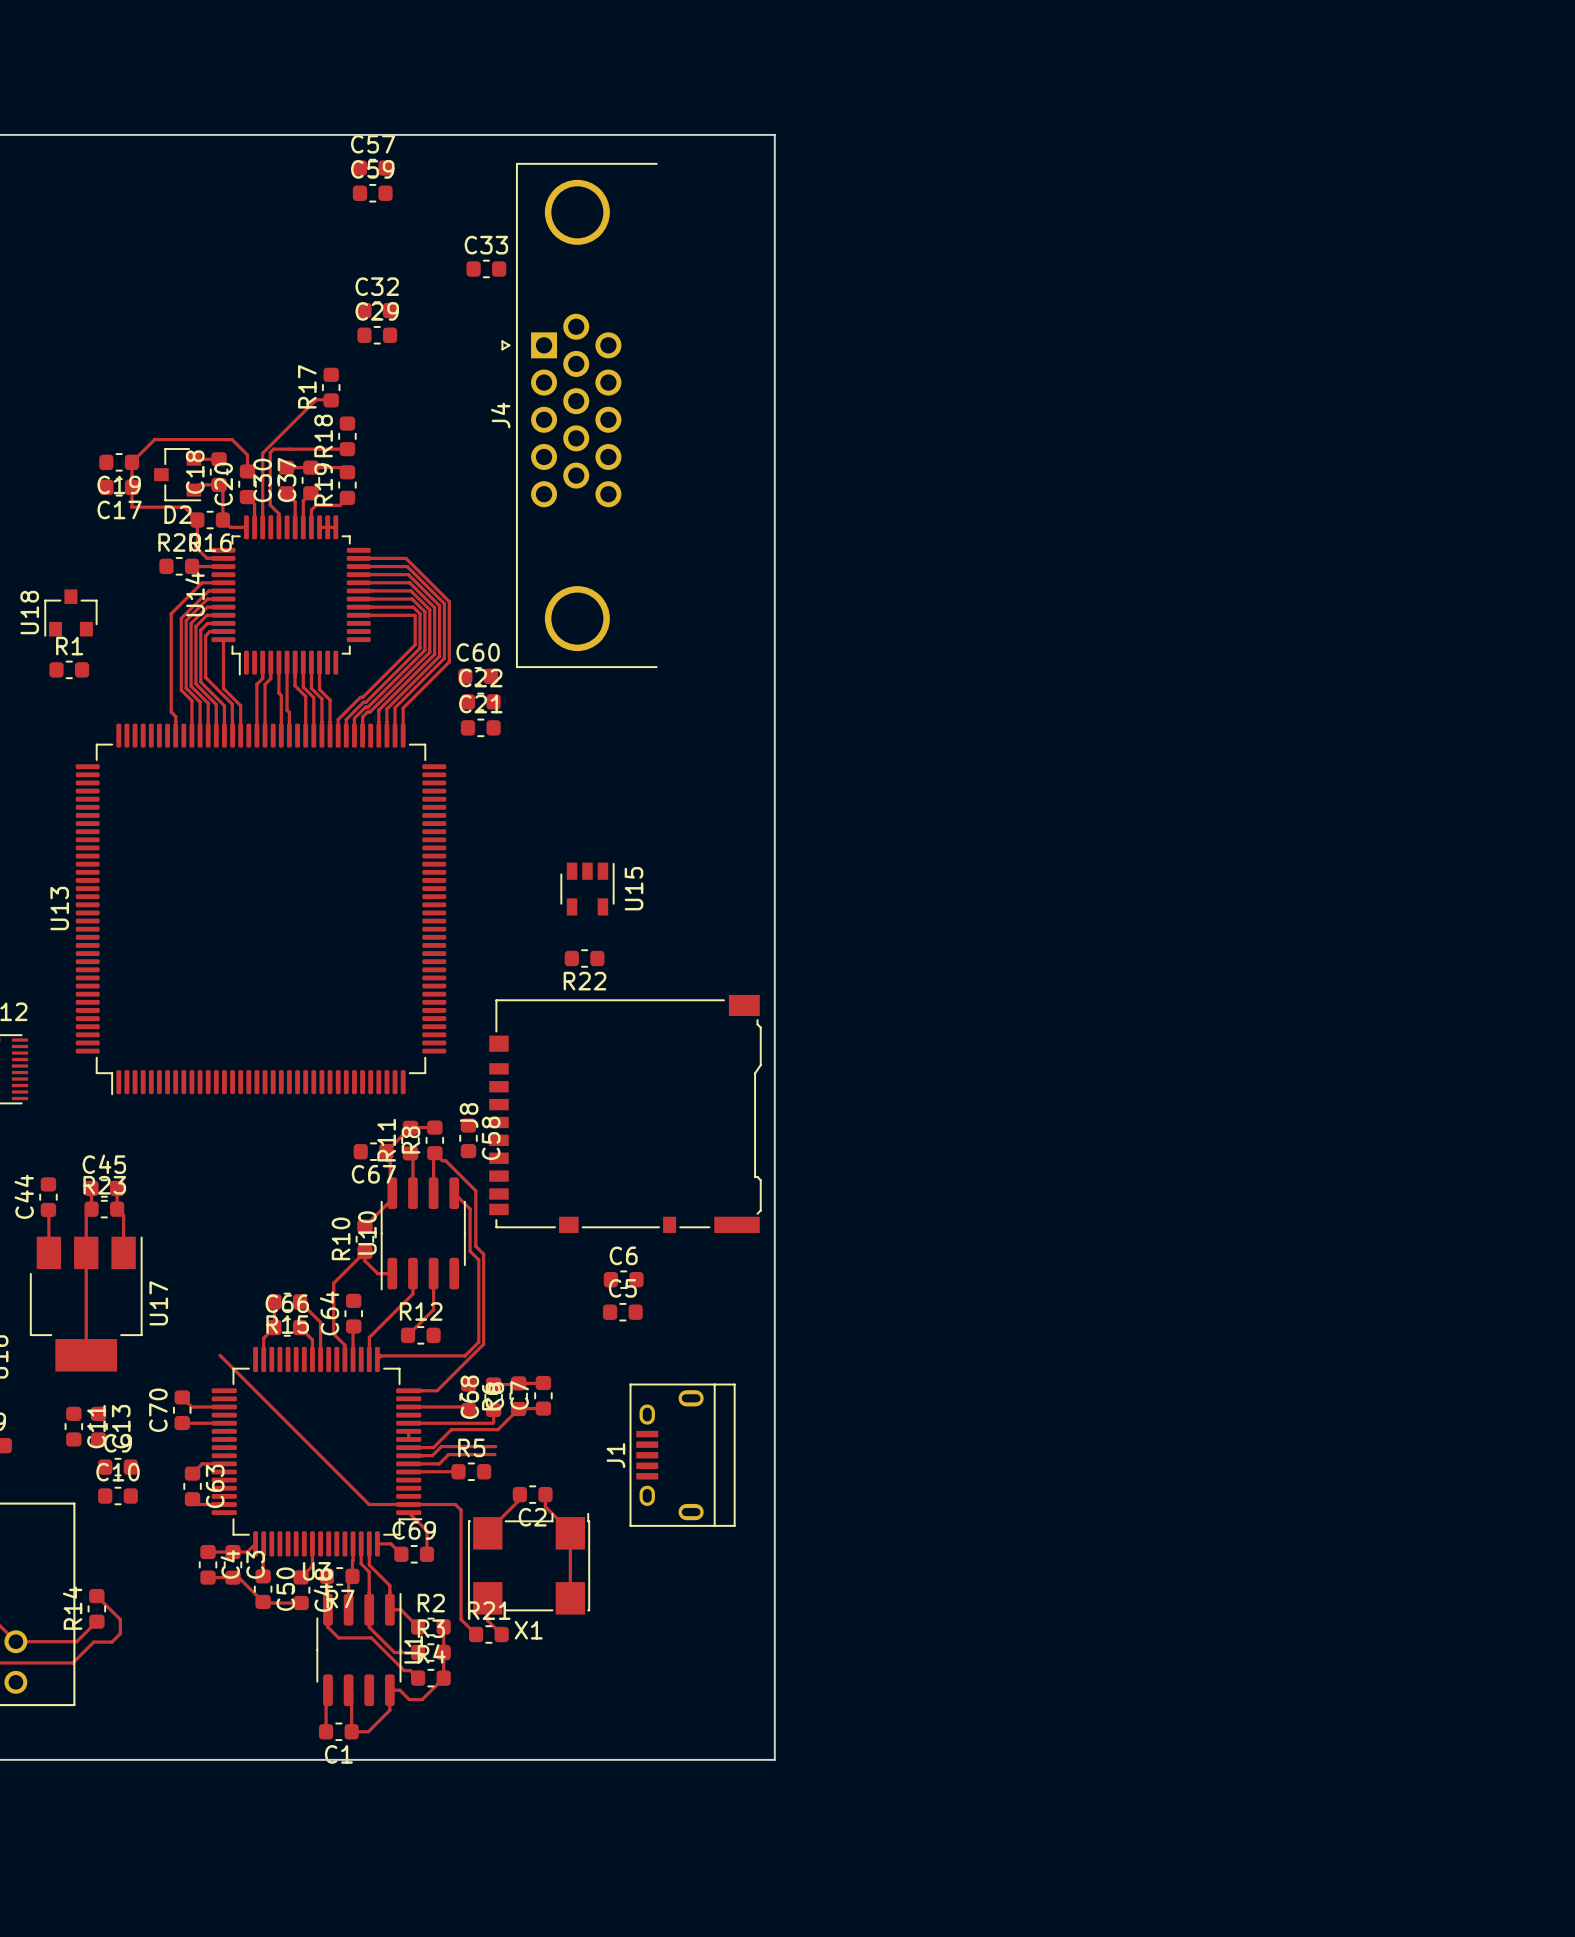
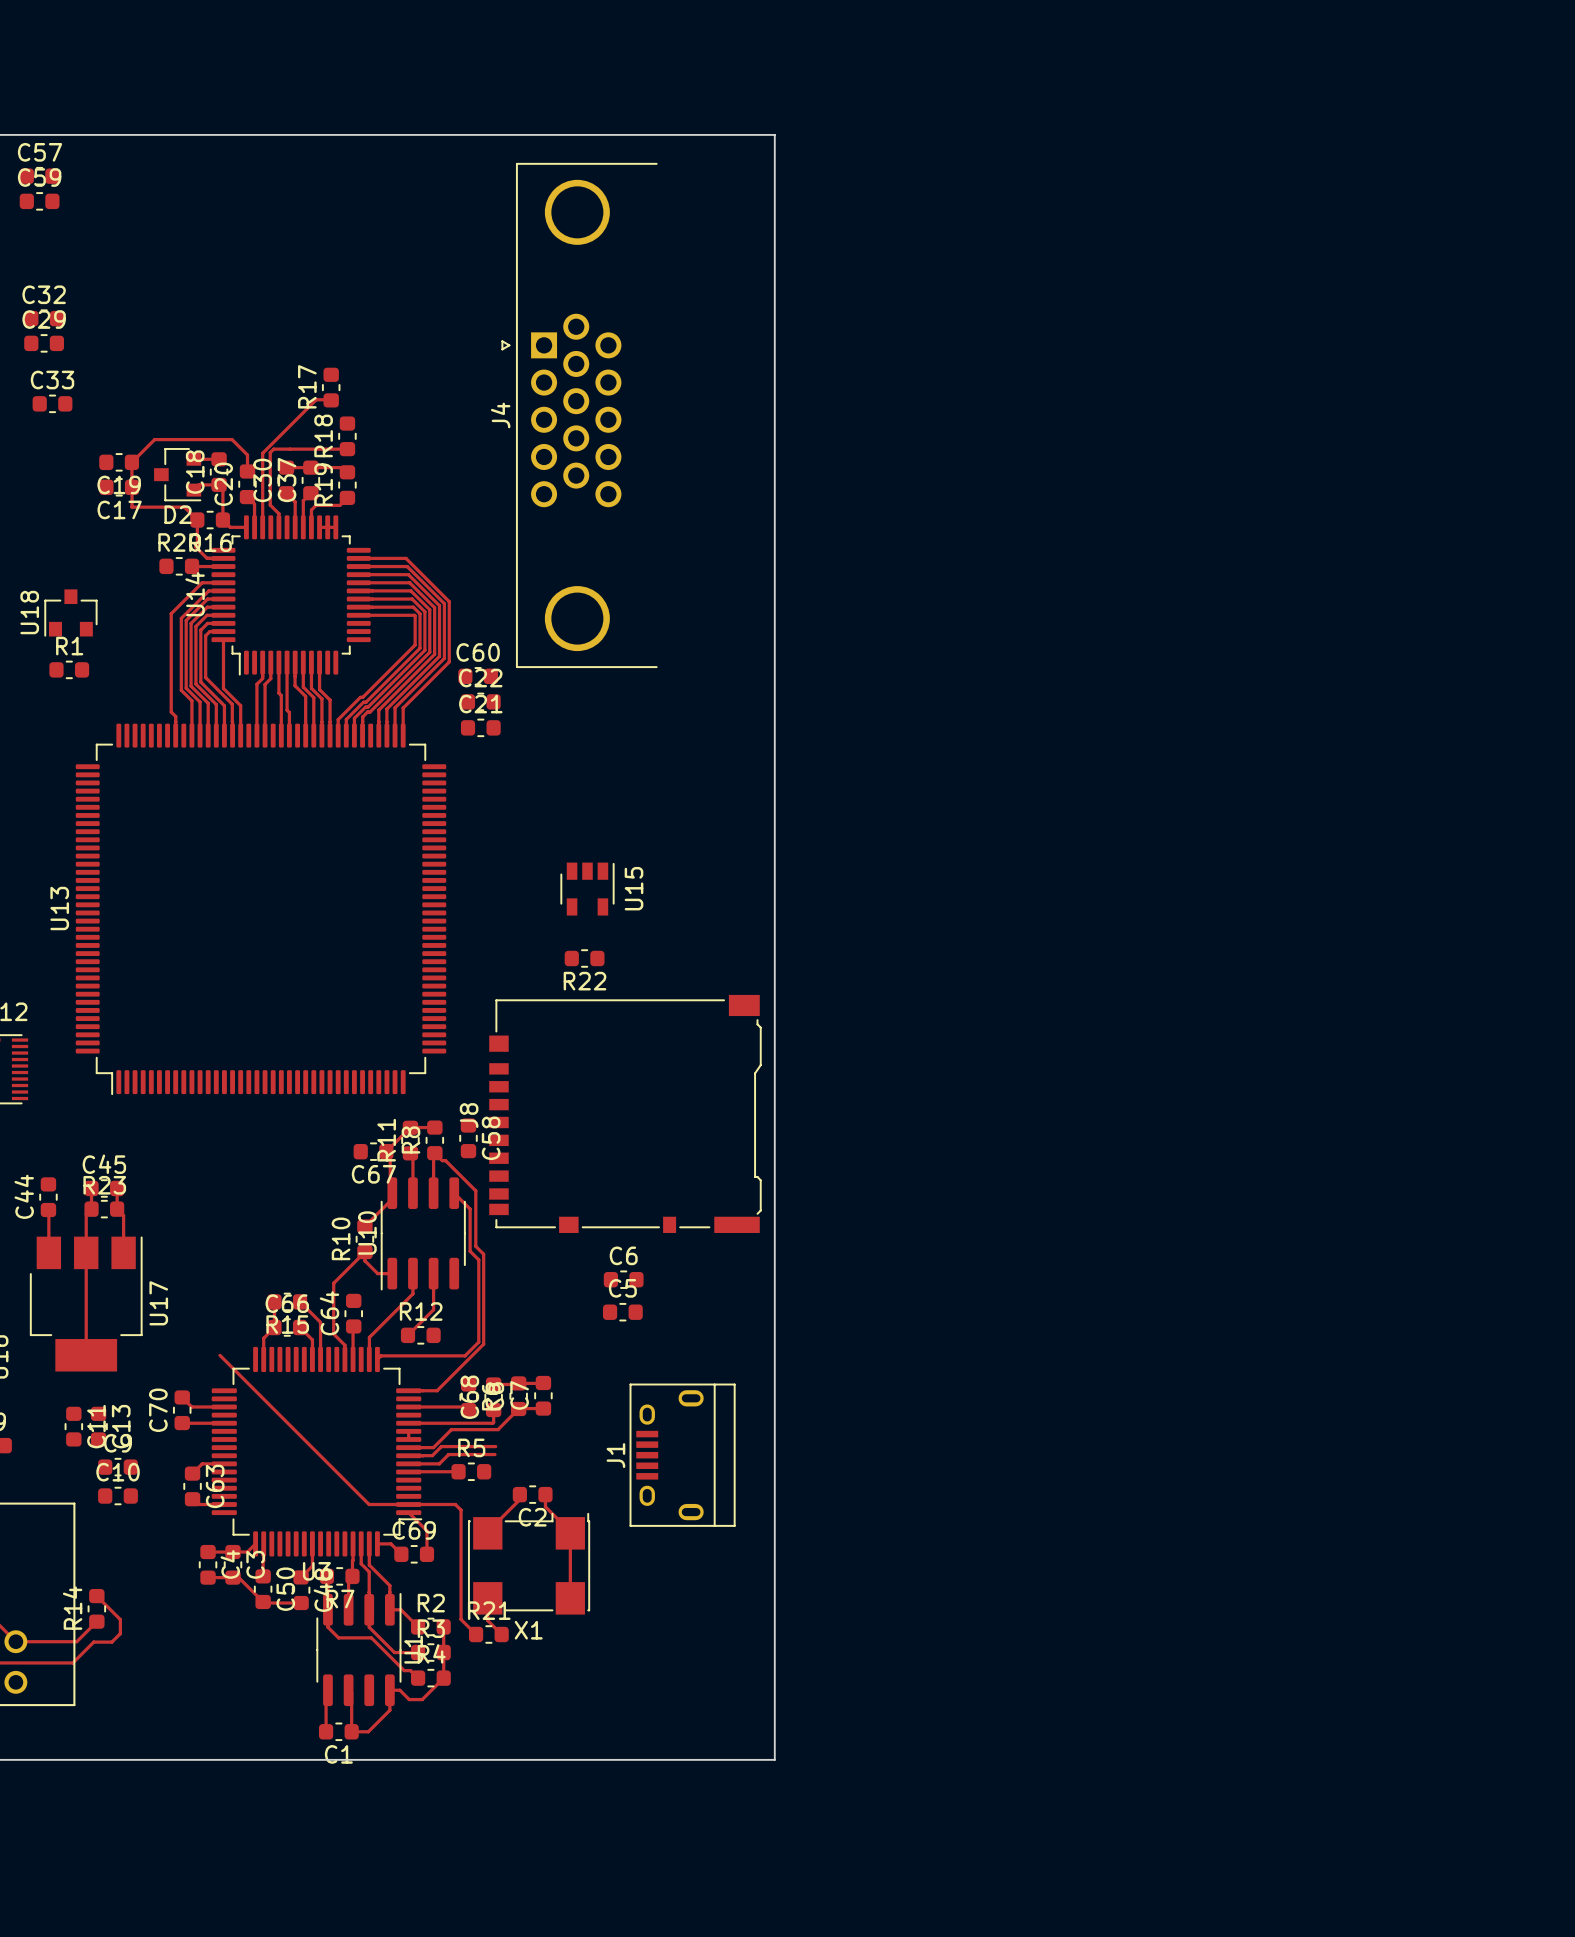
C57 position: (372, 168) -> (39, 176)
C59 position: (372, 193) -> (39, 201)
C33 position: (486, 268) -> (52, 403)
C32 position: (377, 310) -> (44, 318)
C29 position: (377, 335) -> (44, 343)

